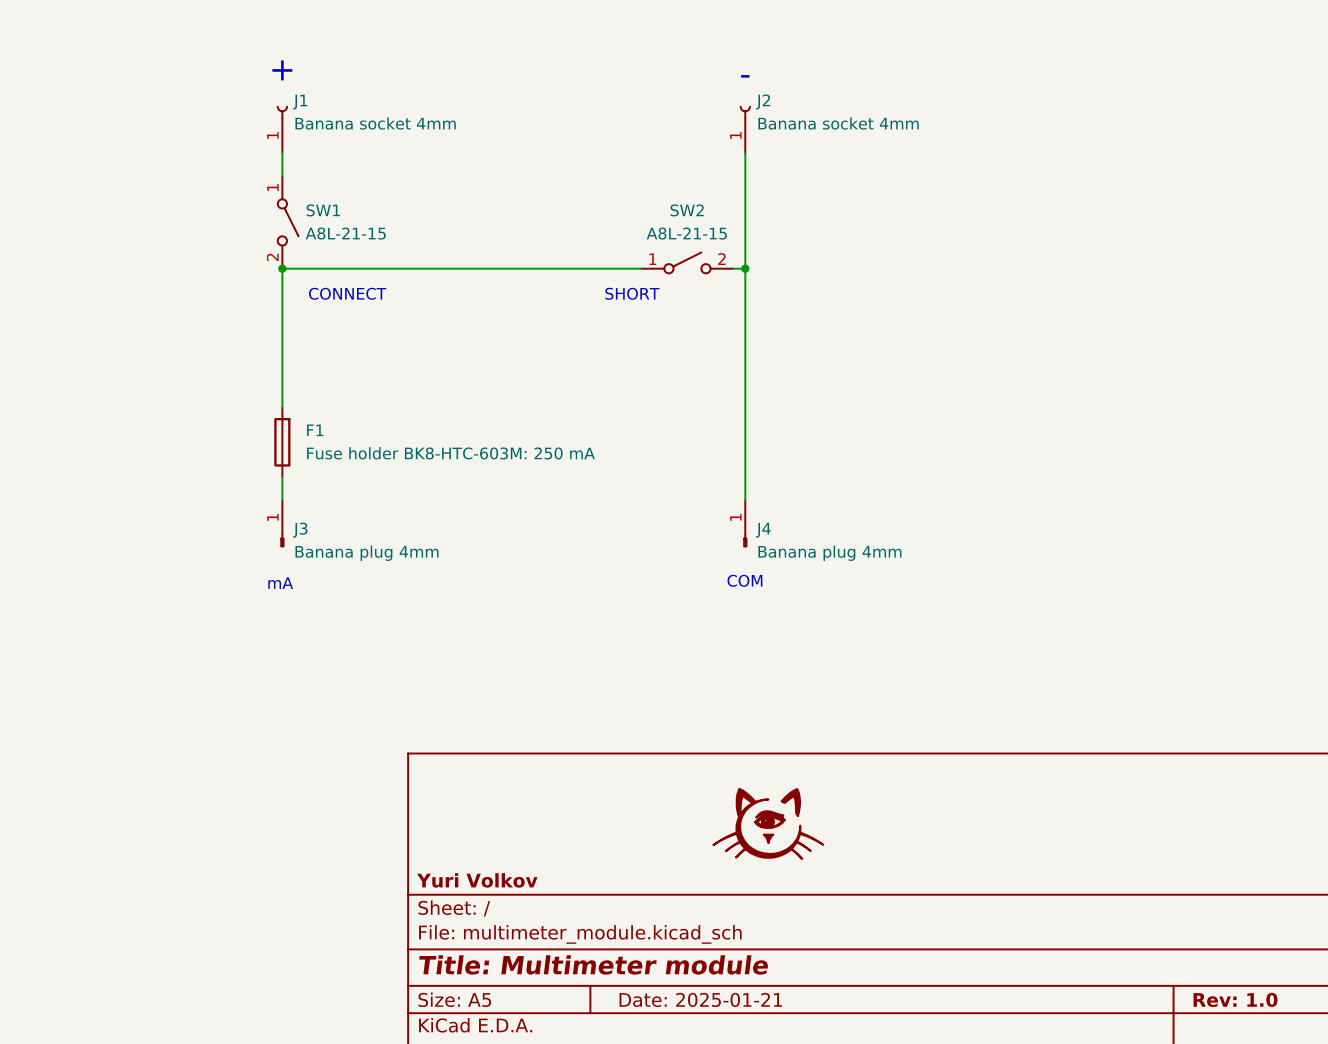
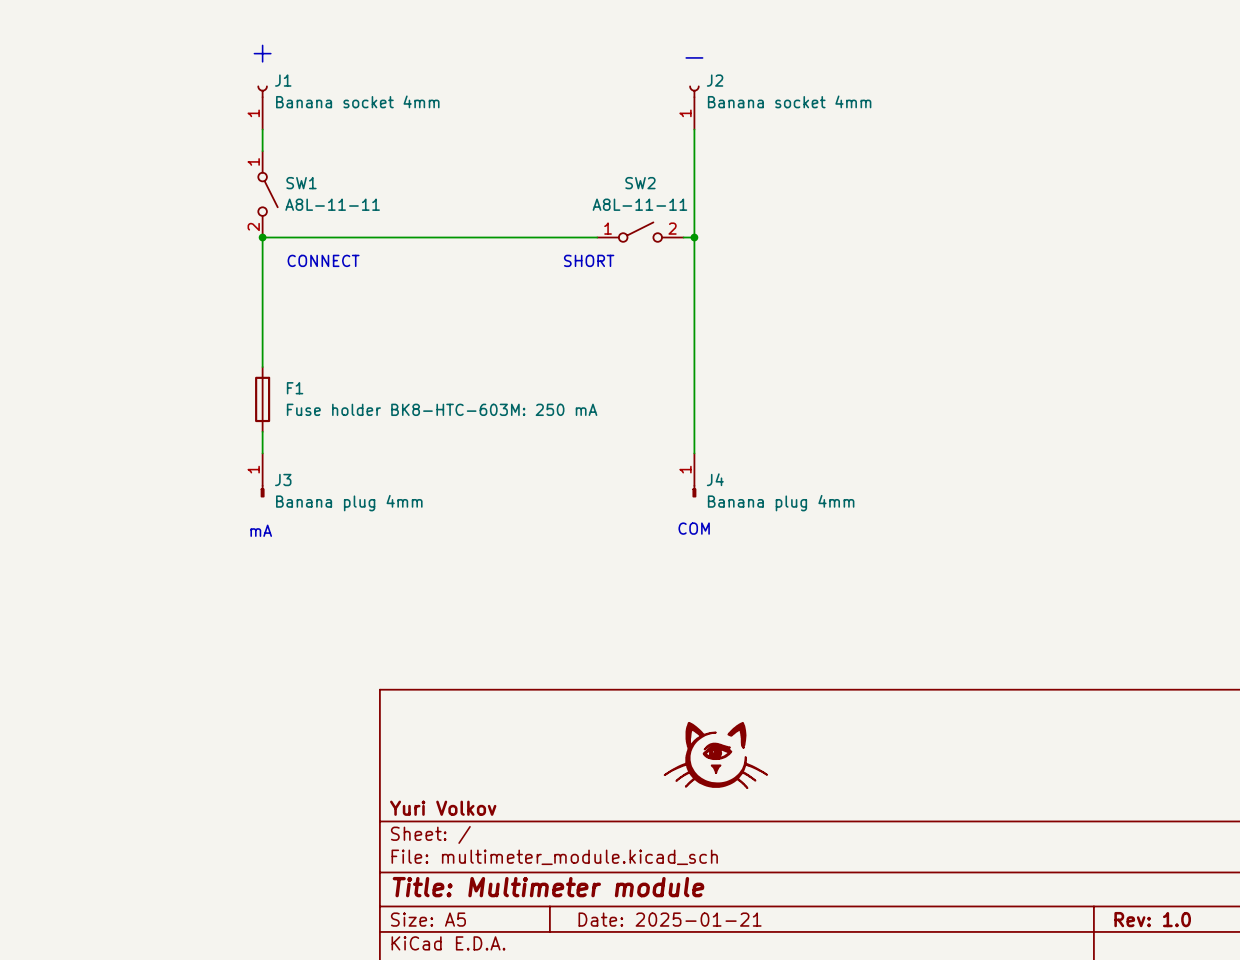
SW1 value: A8L-21-15 (345, 233) -> A8L-11-11 (332, 204)
SW2 value: A8L-21-15 (686, 233) -> A8L-11-11 (639, 204)

